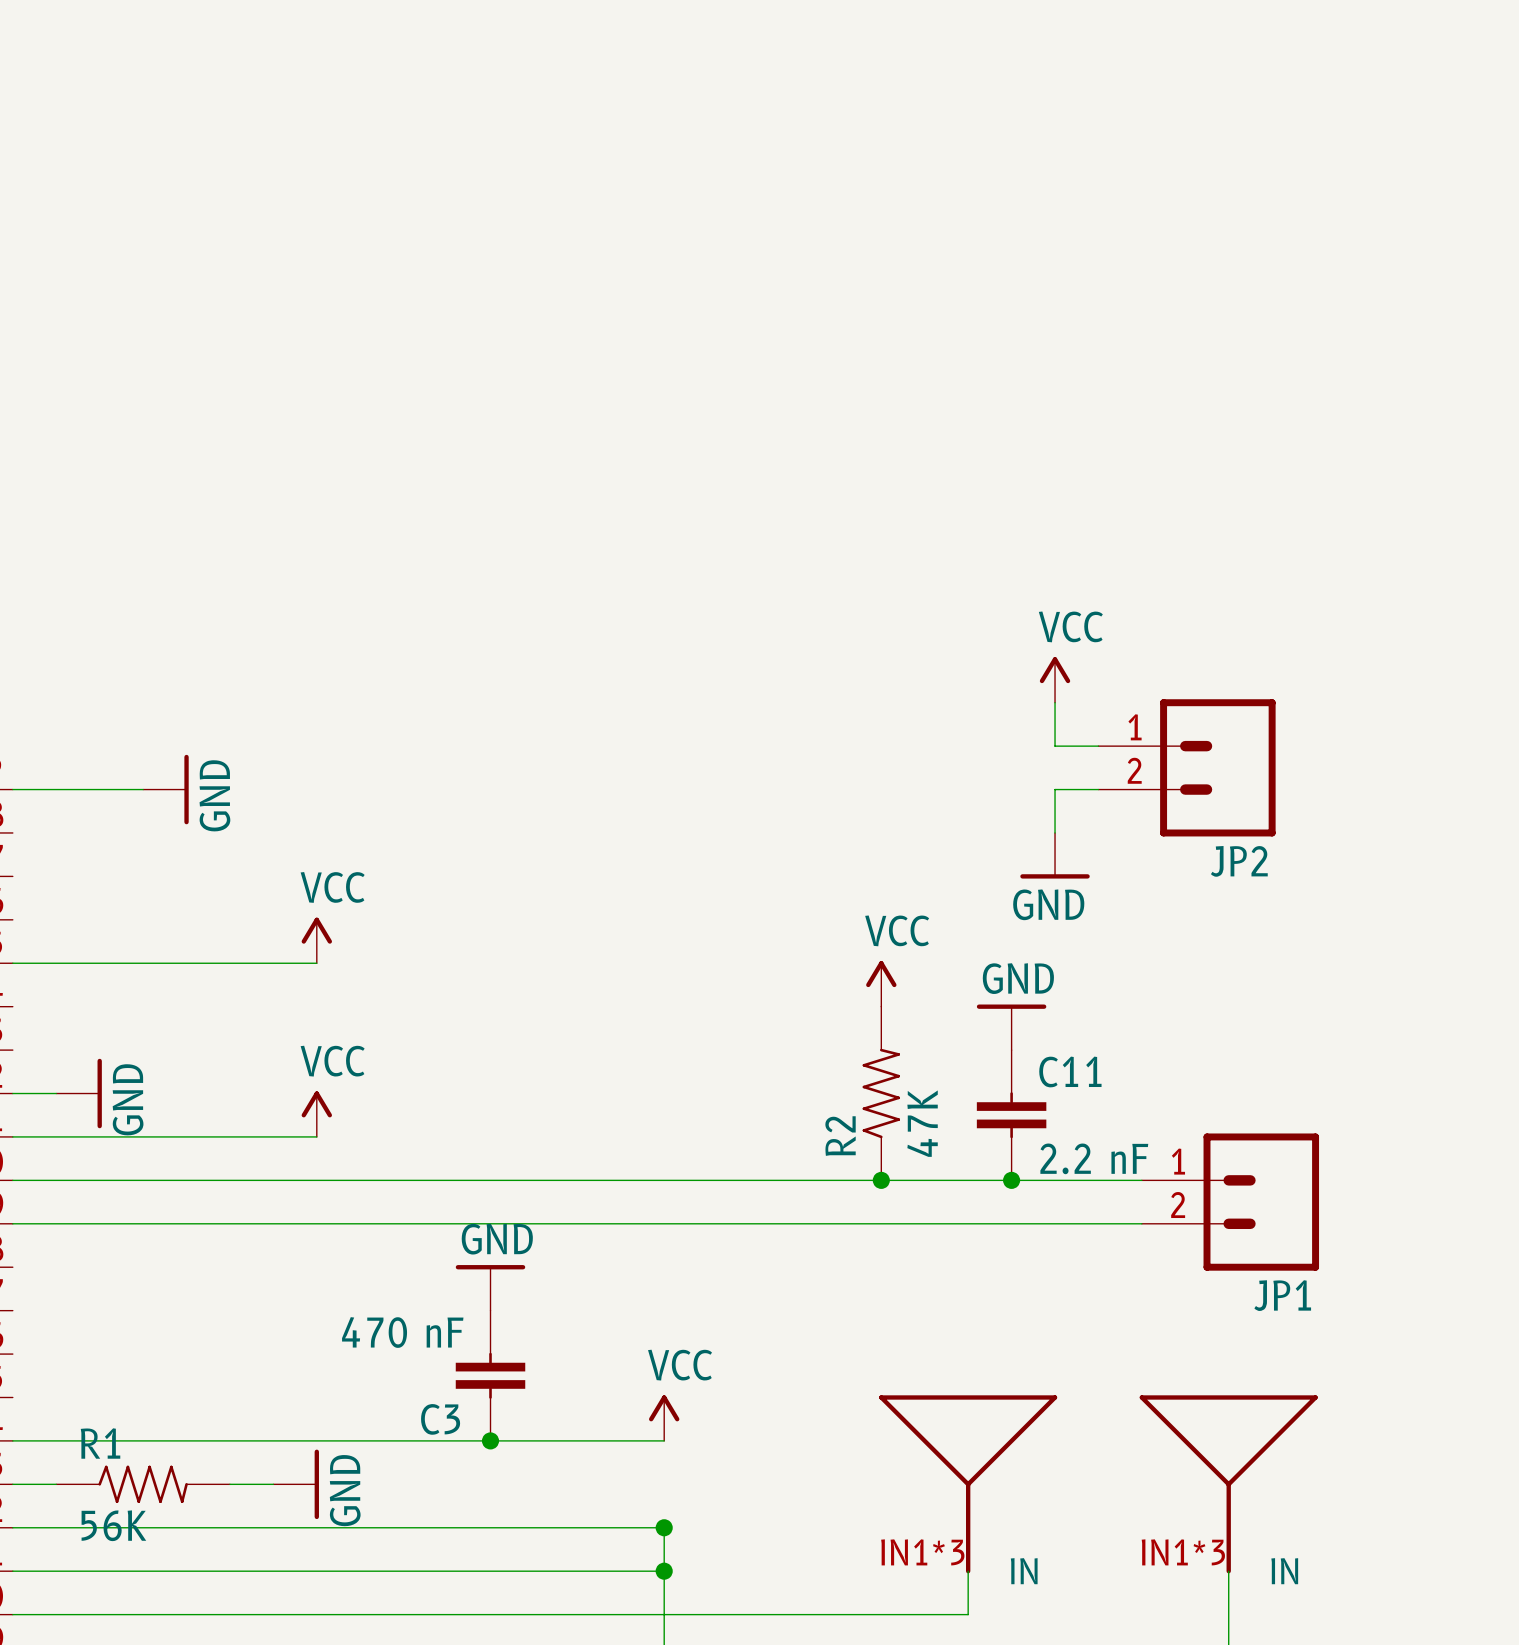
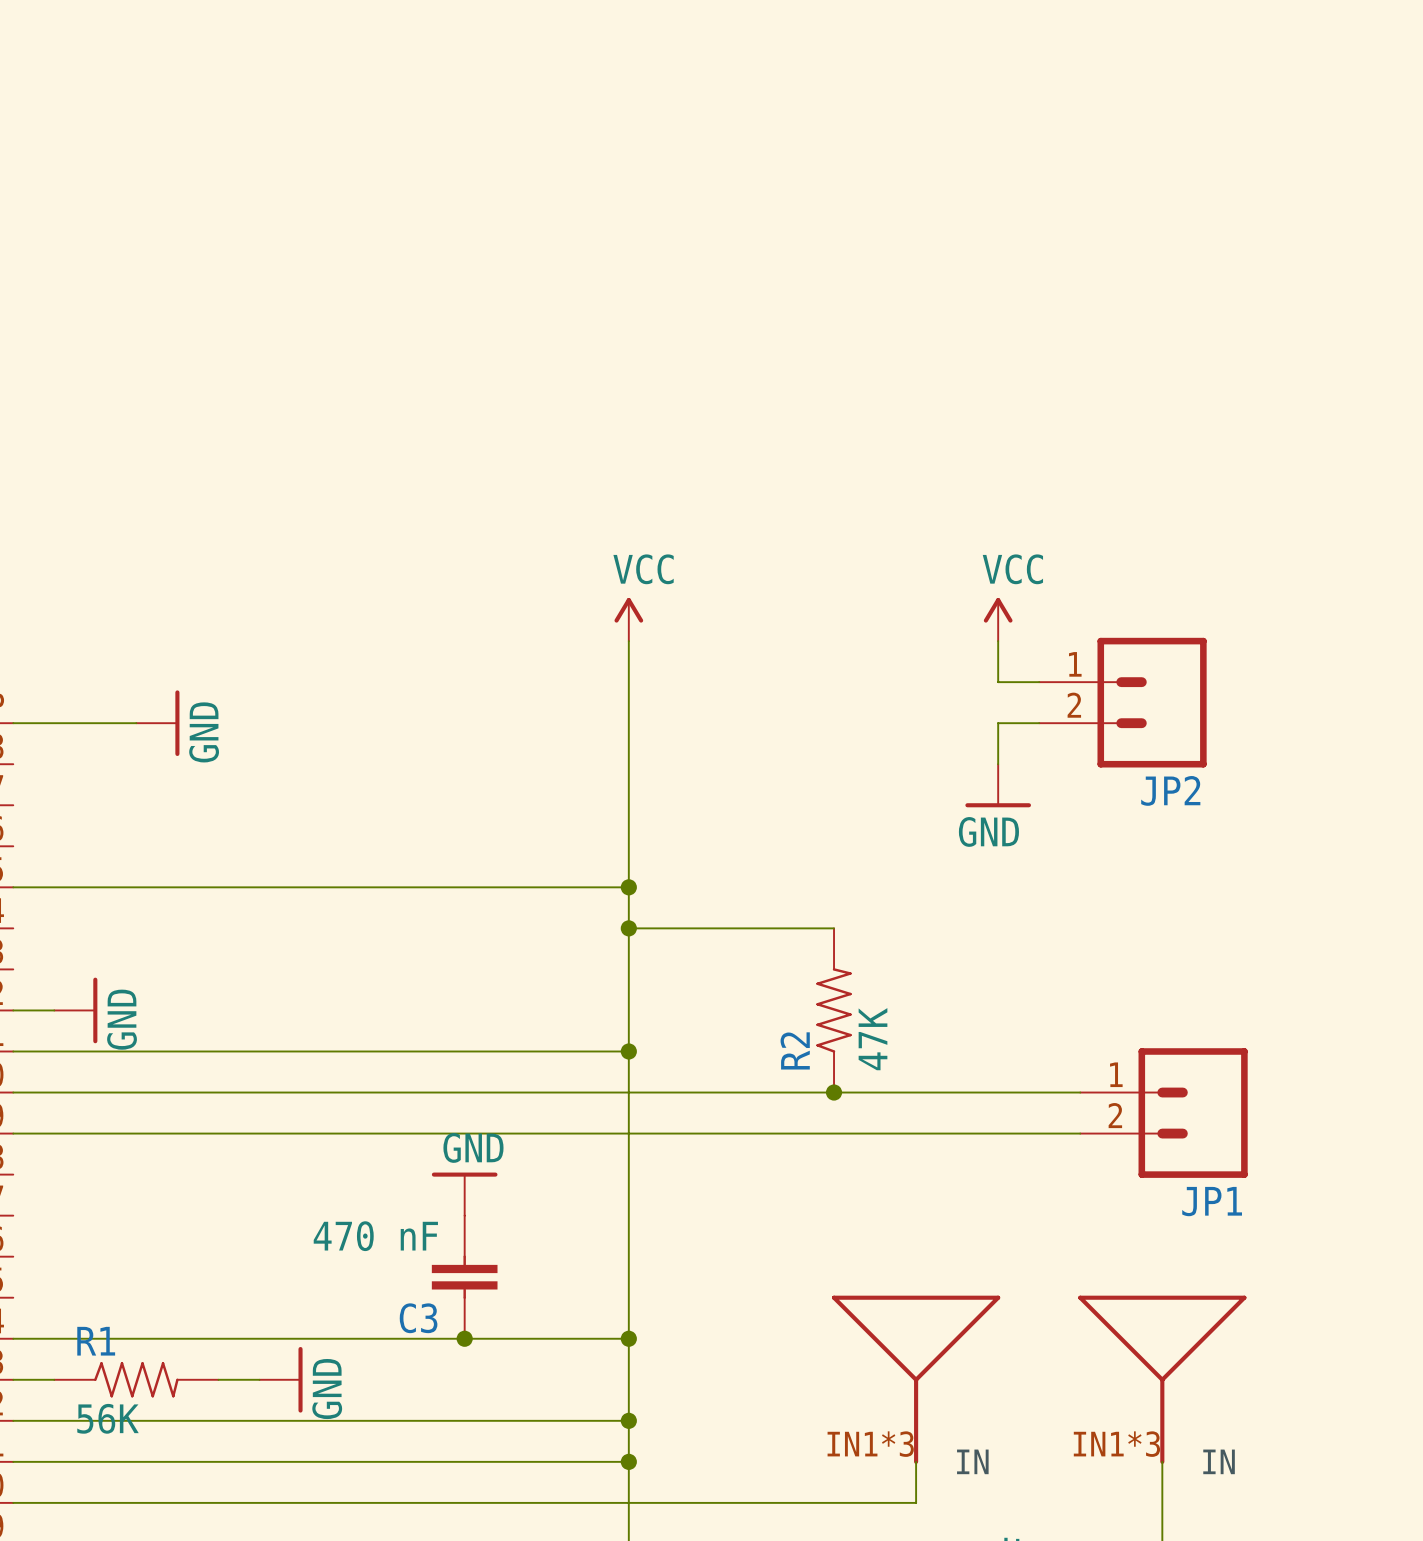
power symbol: none -> VCC (628, 619)
wire: none -> (628, 641) (628, 1420)
power symbol: VCC (316, 940) -> none
wire: none -> (300, 887) (628, 887)
junction: none -> (628, 887)
power symbol: VCC (881, 983) -> none
wire: none -> (628, 928) (834, 928)
junction: none -> (628, 928)
power symbol: GND (1011, 1027) -> none
power symbol: VCC (316, 1114) -> none
C11: 2.2 nF (1011, 1115) -> none
wire: none -> (300, 1051) (628, 1051)
junction: none -> (628, 1051)
junction: (1011, 1180) -> none
power symbol: VCC (664, 1418) -> none
junction: none -> (628, 1338)

